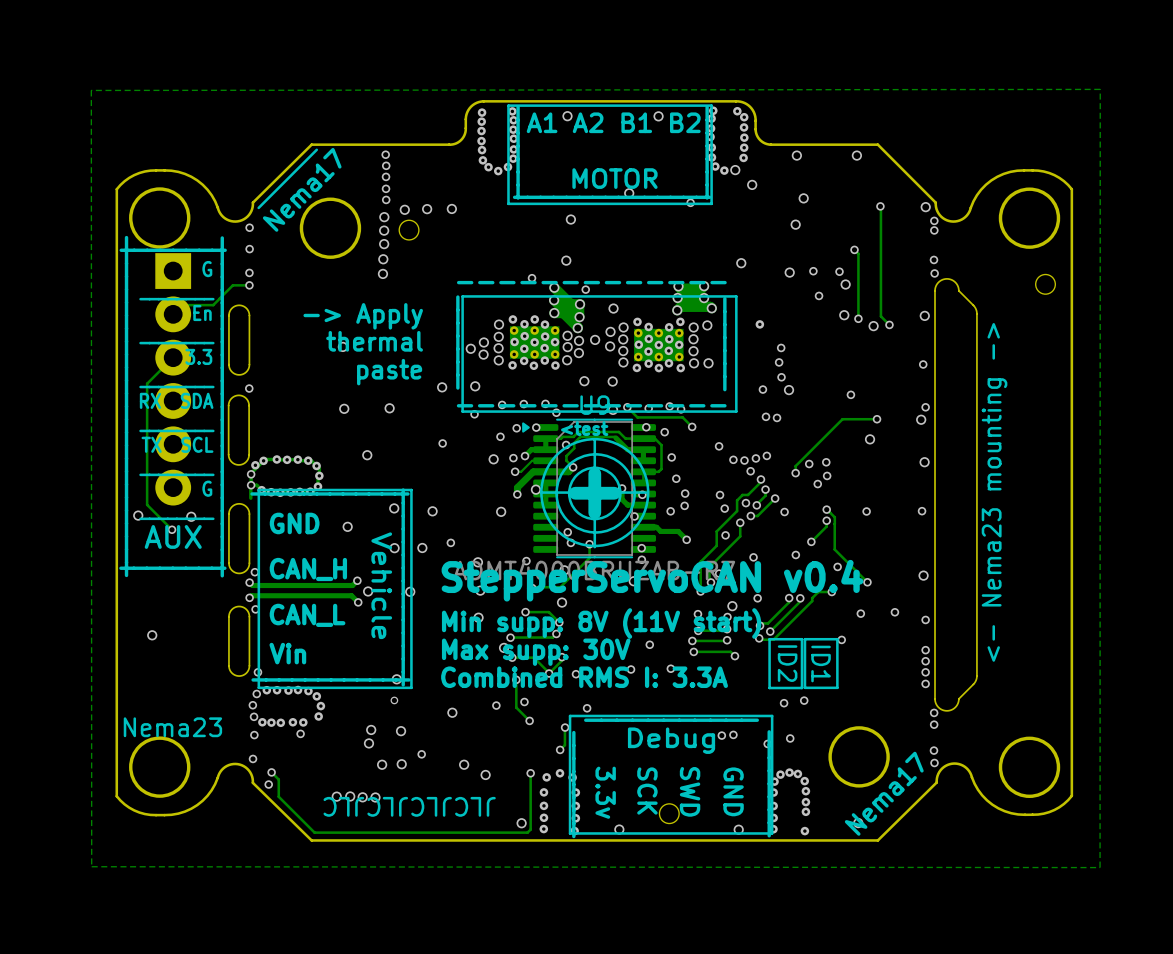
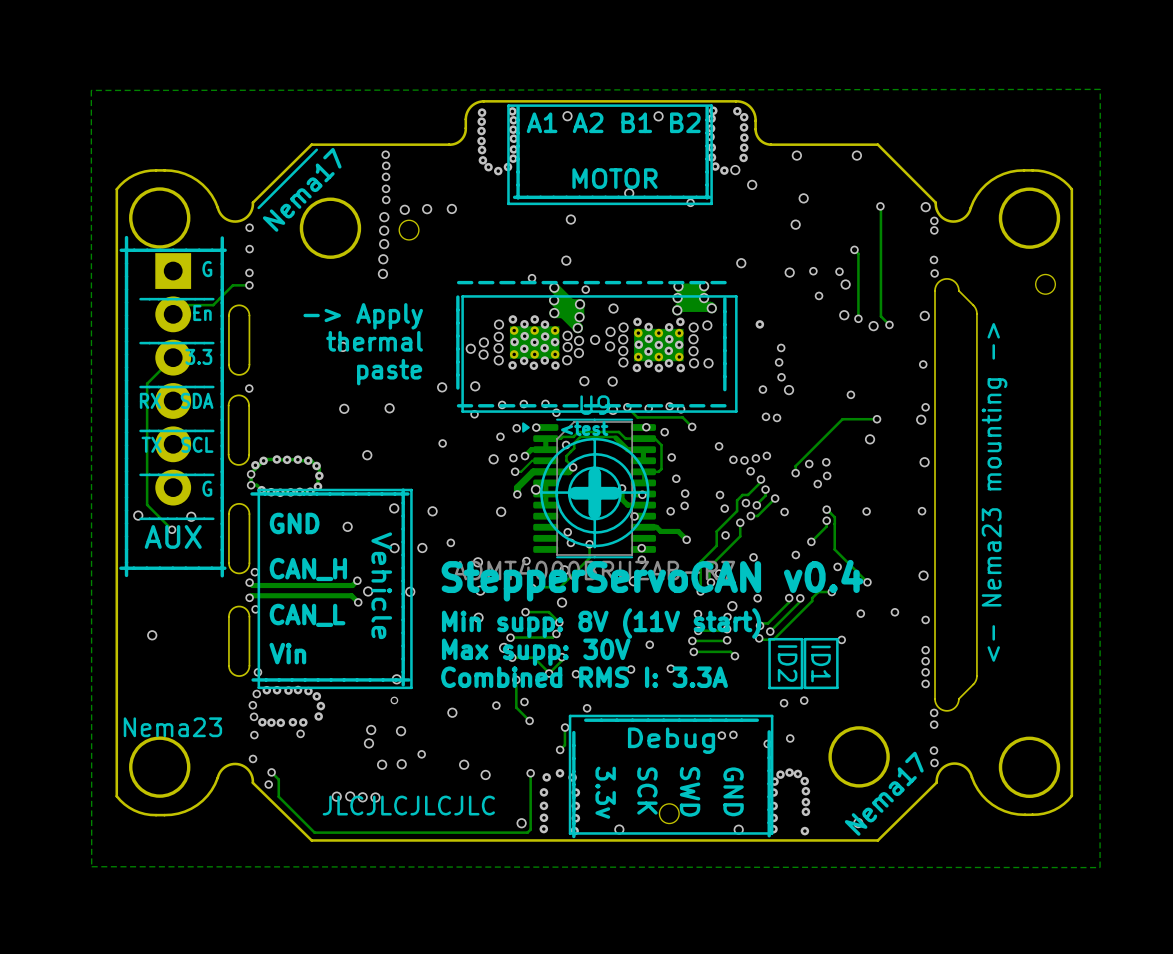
track: (250, 485) (250, 498) -> none
text rotation: 0° (409, 806) -> 180° (408, 805)

